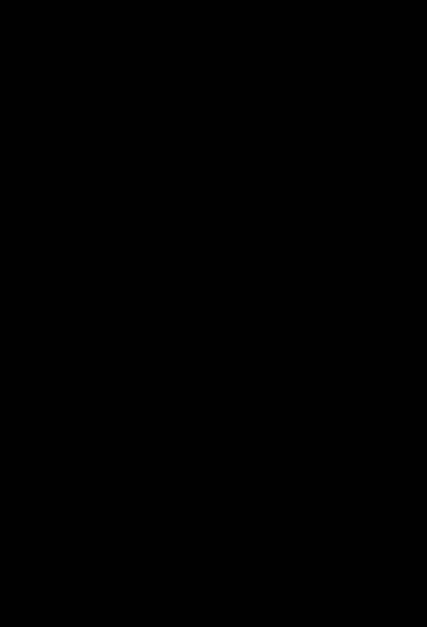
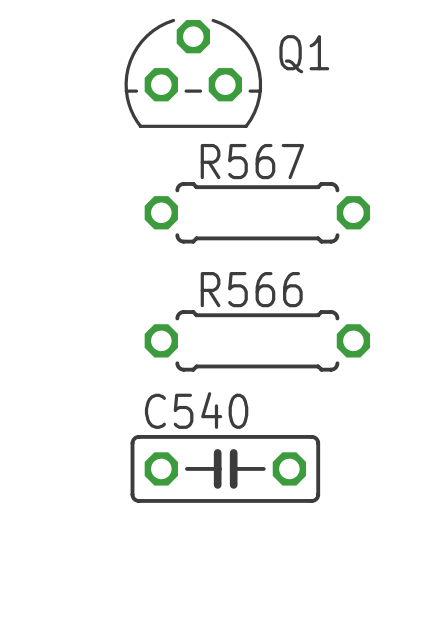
Q1: none -> (193, 73)
R567: none -> (257, 212)
R566: none -> (257, 340)
C540: none -> (225, 468)

